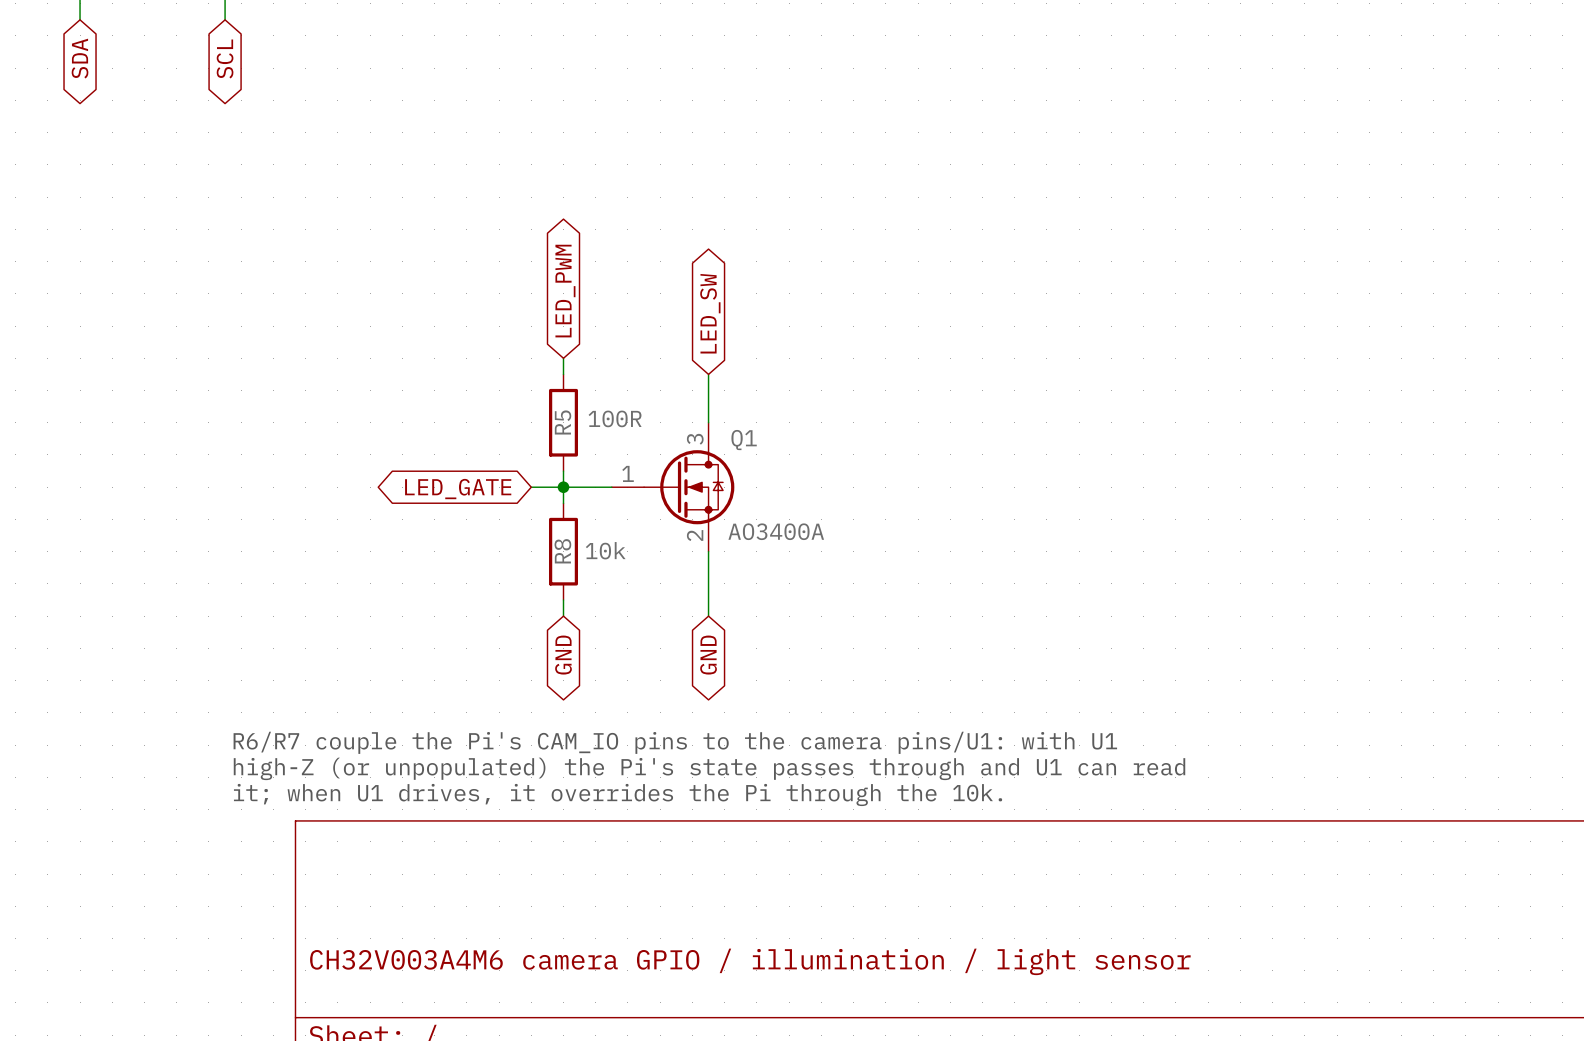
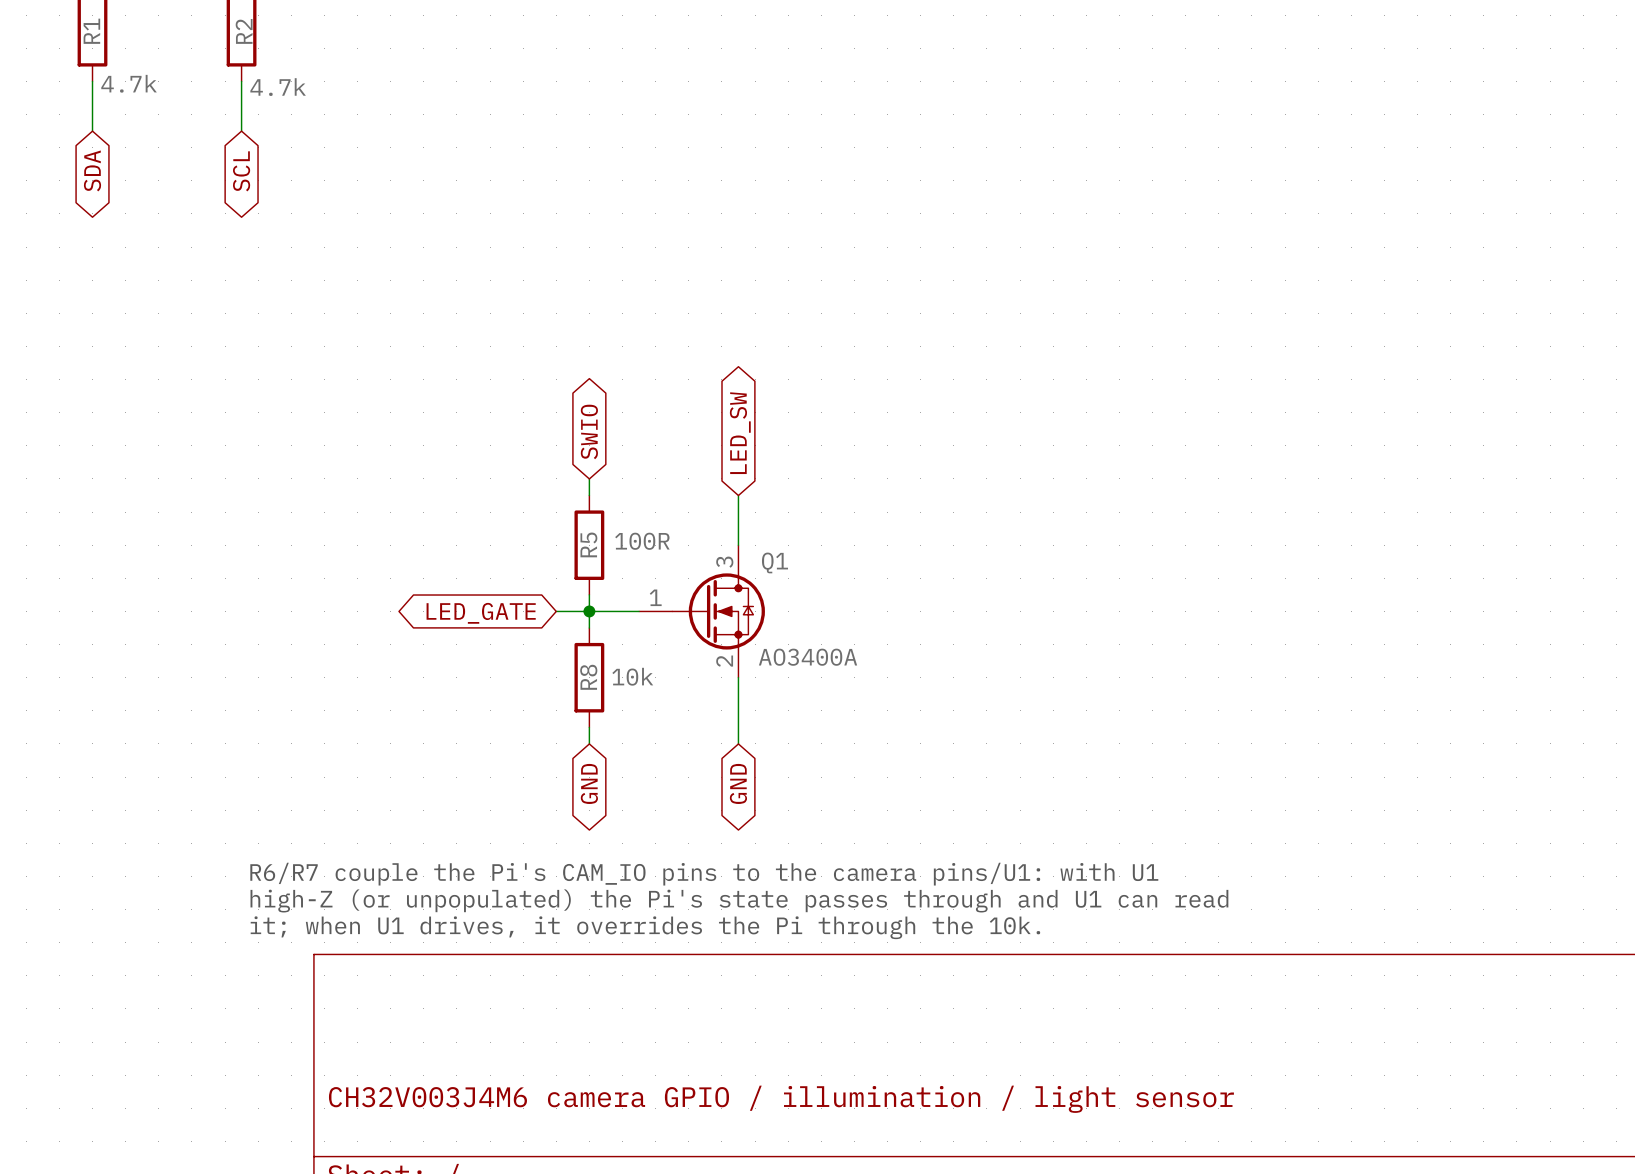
global label: LED_PWM (565, 291) -> SWIO (589, 431)
title block: CH32V003A4M6 camera GPIO / illumination / light sensor (750, 961) -> CH32V003J4M6 camera GPIO / illumination / light sensor (781, 1099)

